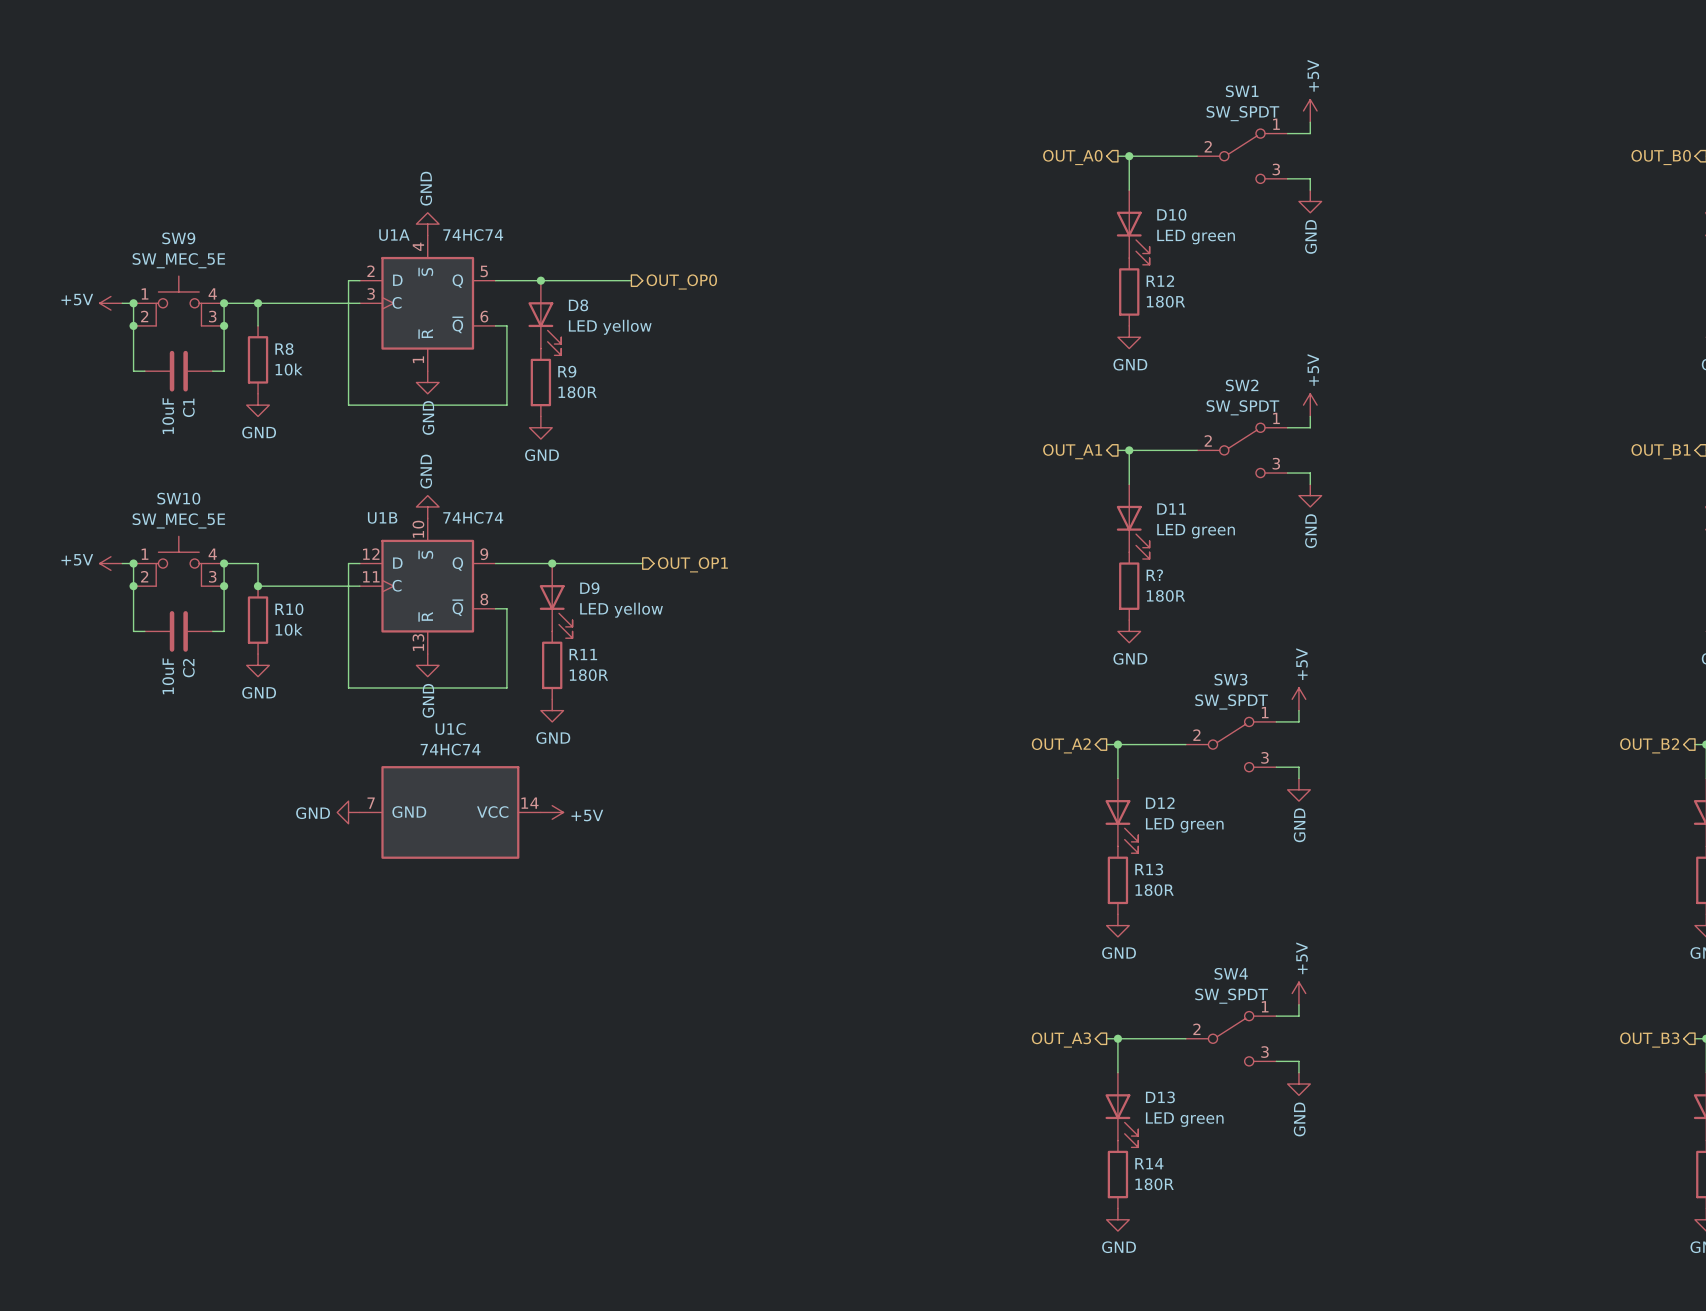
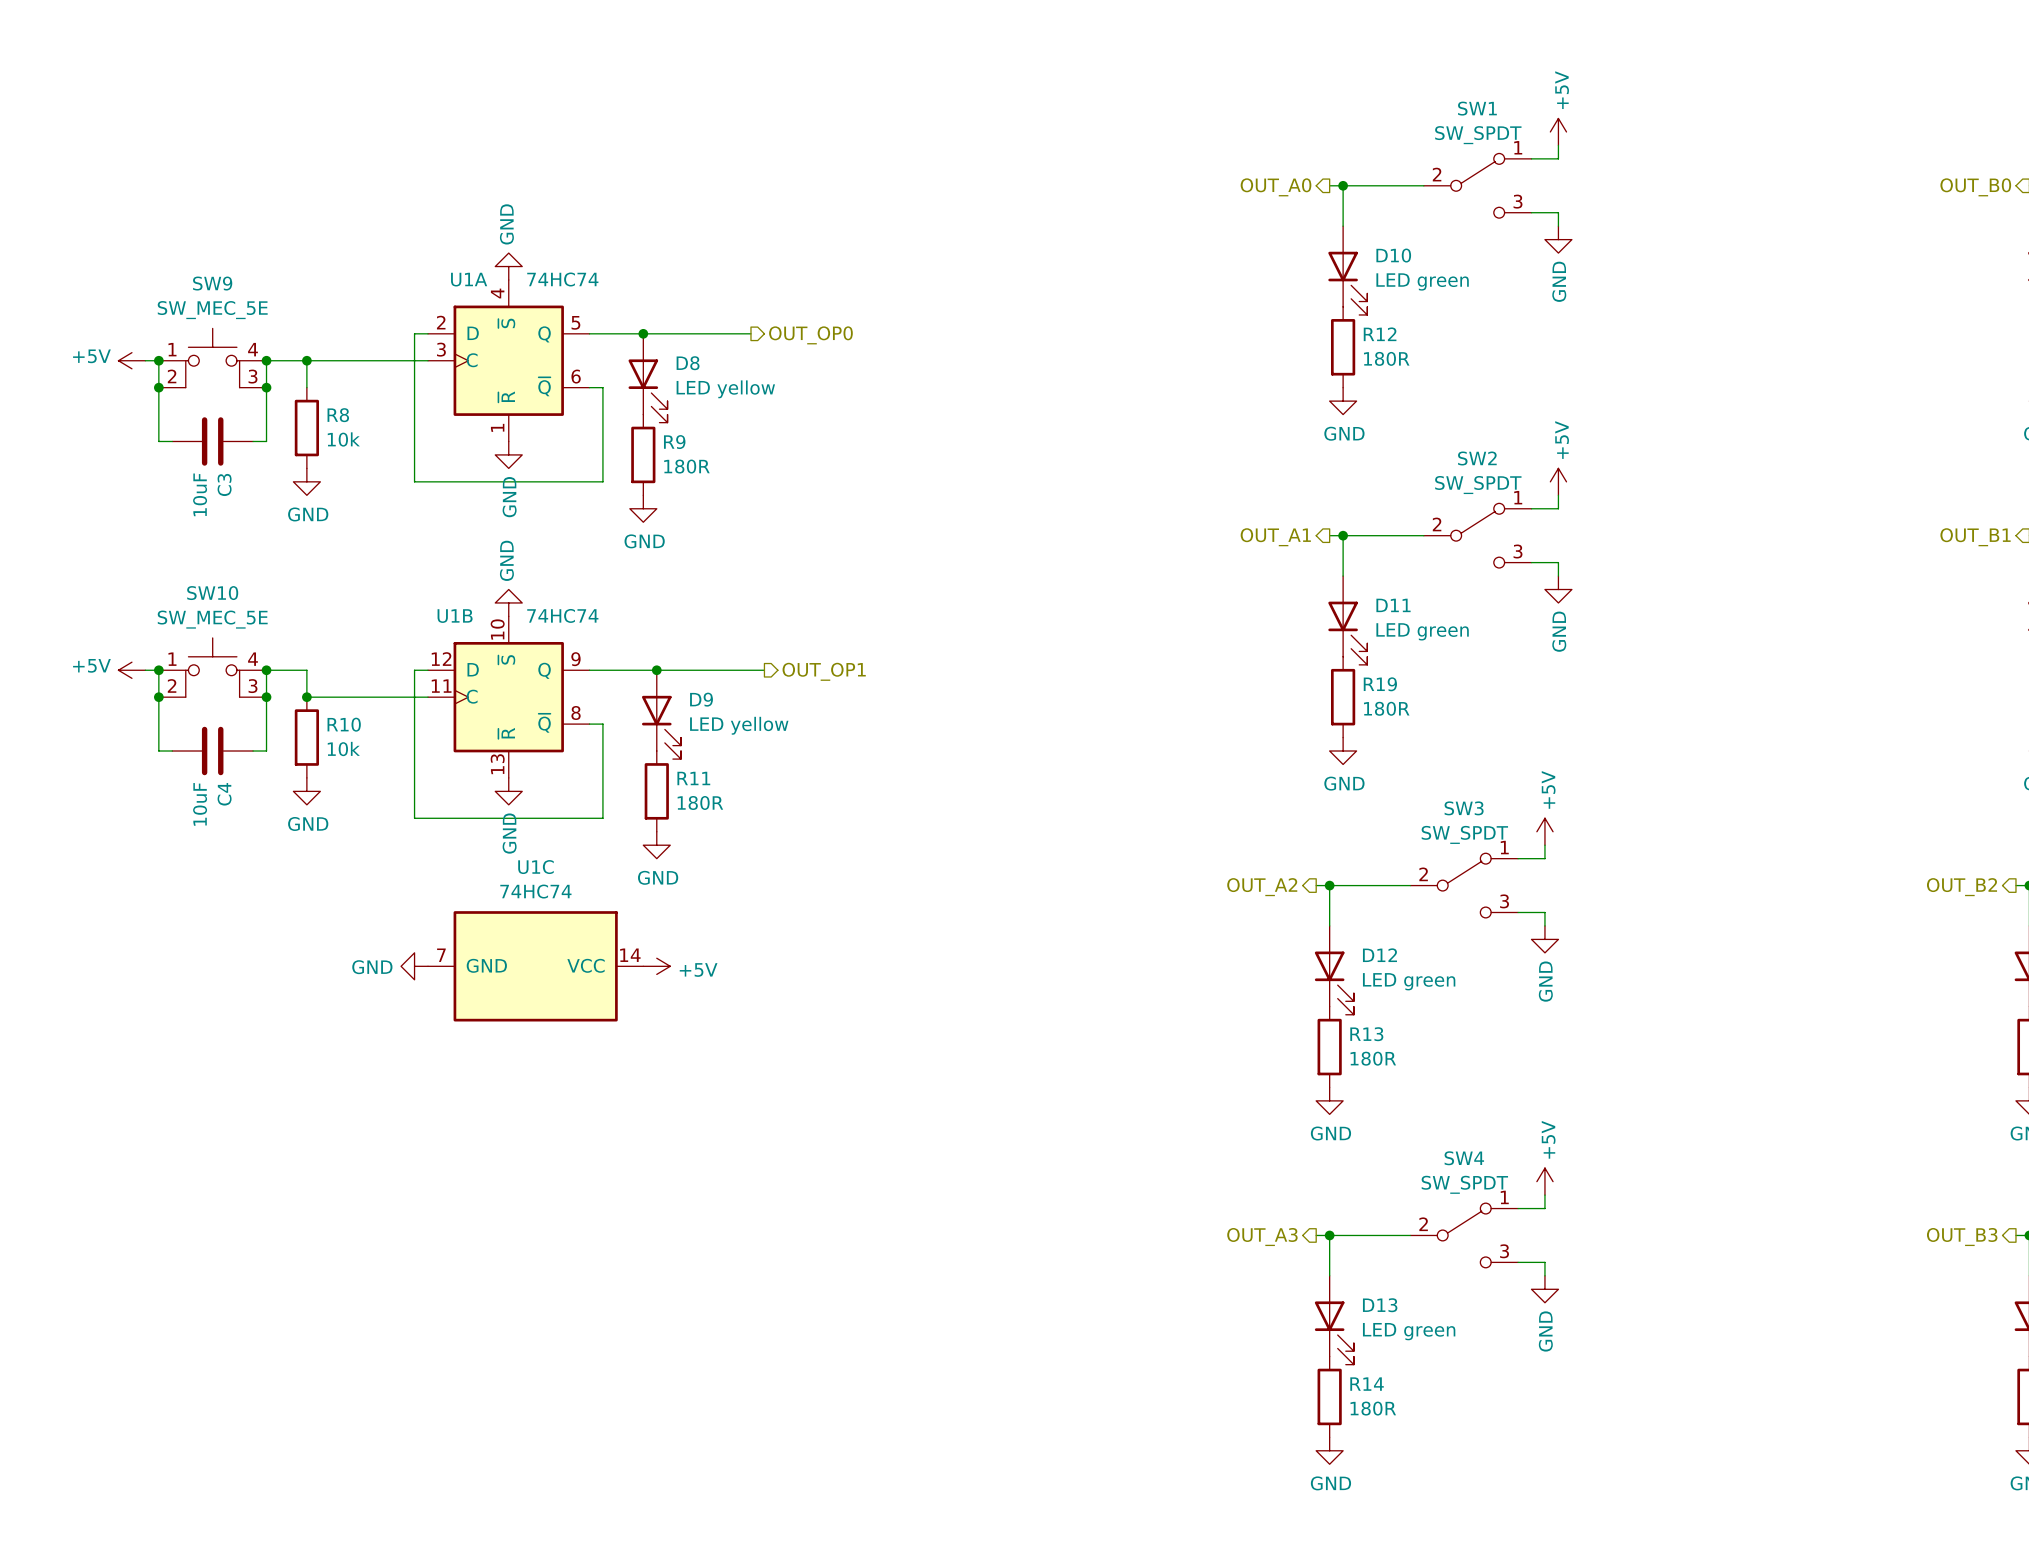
C1 name: C1 (188, 407) -> C3 (224, 484)
R? name: R? (1154, 575) -> R19 (1380, 684)
C2 name: C2 (188, 668) -> C4 (224, 794)

